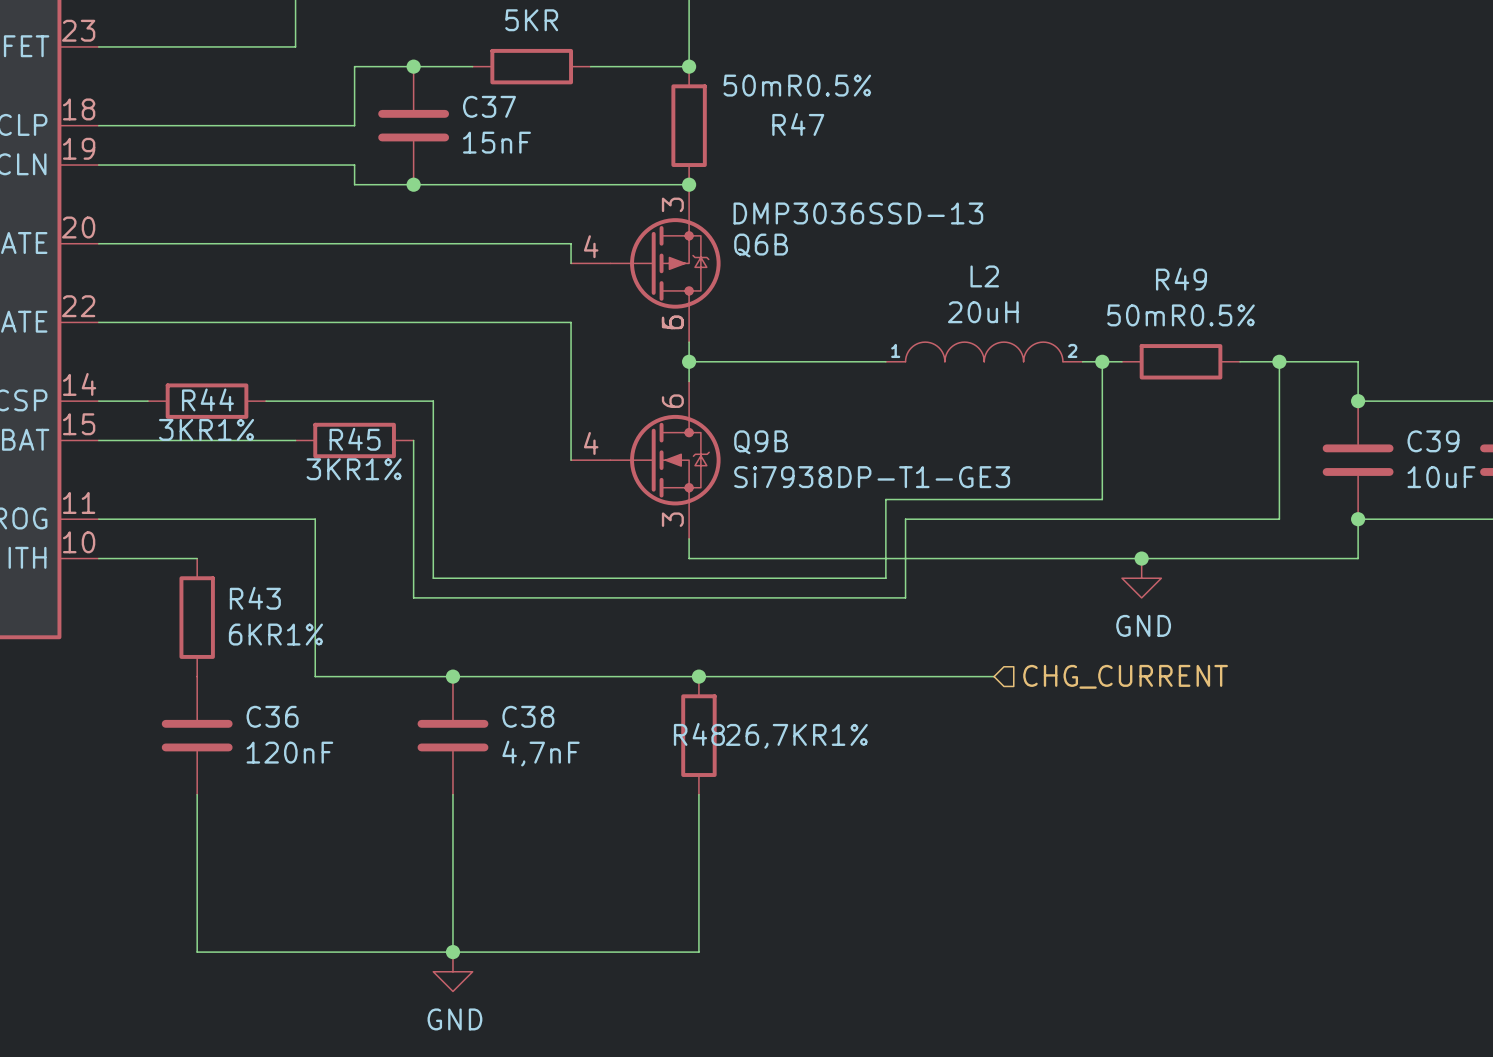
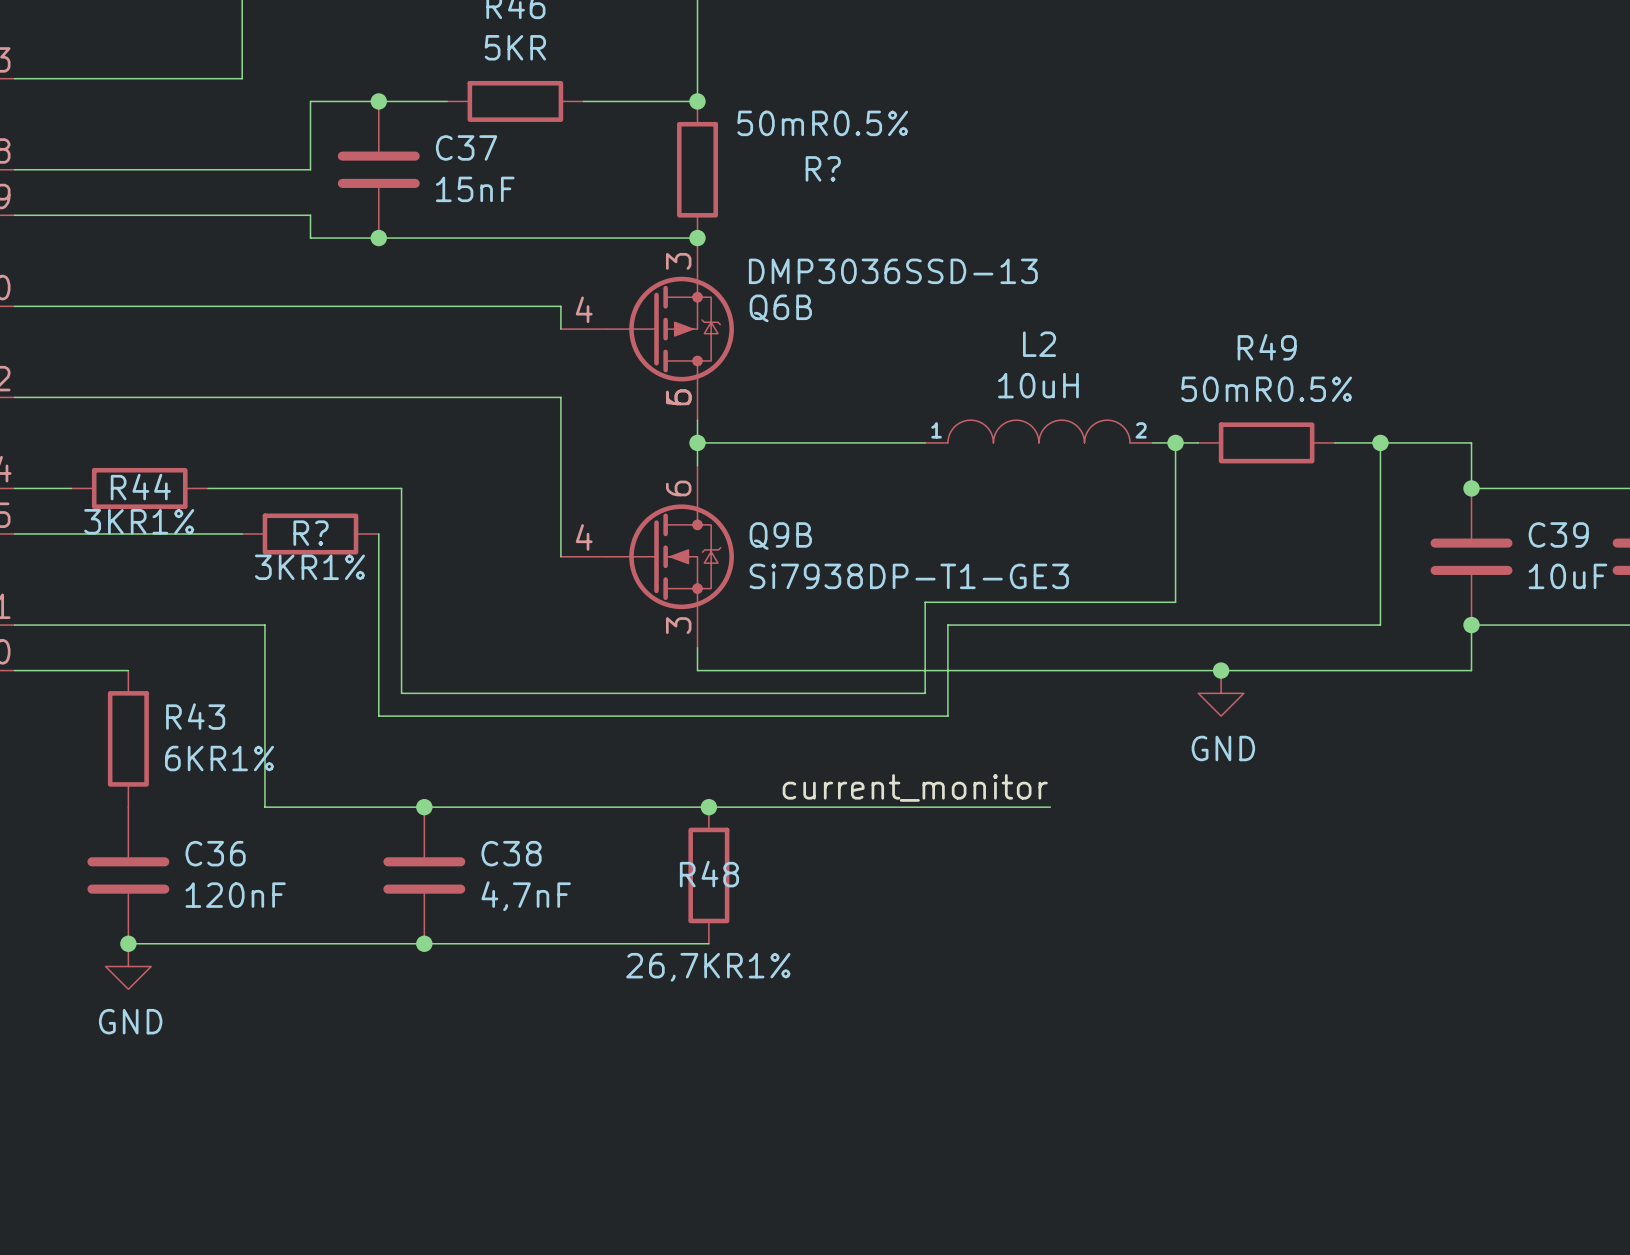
R47 name: R47 (798, 124) -> R? (823, 168)
L2 value: 20uH (983, 312) -> 10uH (1038, 385)
R45 name: R45 (355, 439) -> R? (311, 533)
label: none -> current_monitor (915, 787)
hierarchical label: CHG_CURRENT (1125, 676) -> none
R48 value position: 26,7KR1% (796, 736) -> 26,7KR1% (708, 967)
wire: (197, 794) (197, 952) (698, 952) (698, 794) -> (128, 943) (708, 943)
junction: none -> (128, 943)
wire: (452, 794) (452, 952) -> none
junction: none -> (424, 943)
junction: (452, 952) -> none
power symbol position: GND (452, 971) -> GND (128, 966)

